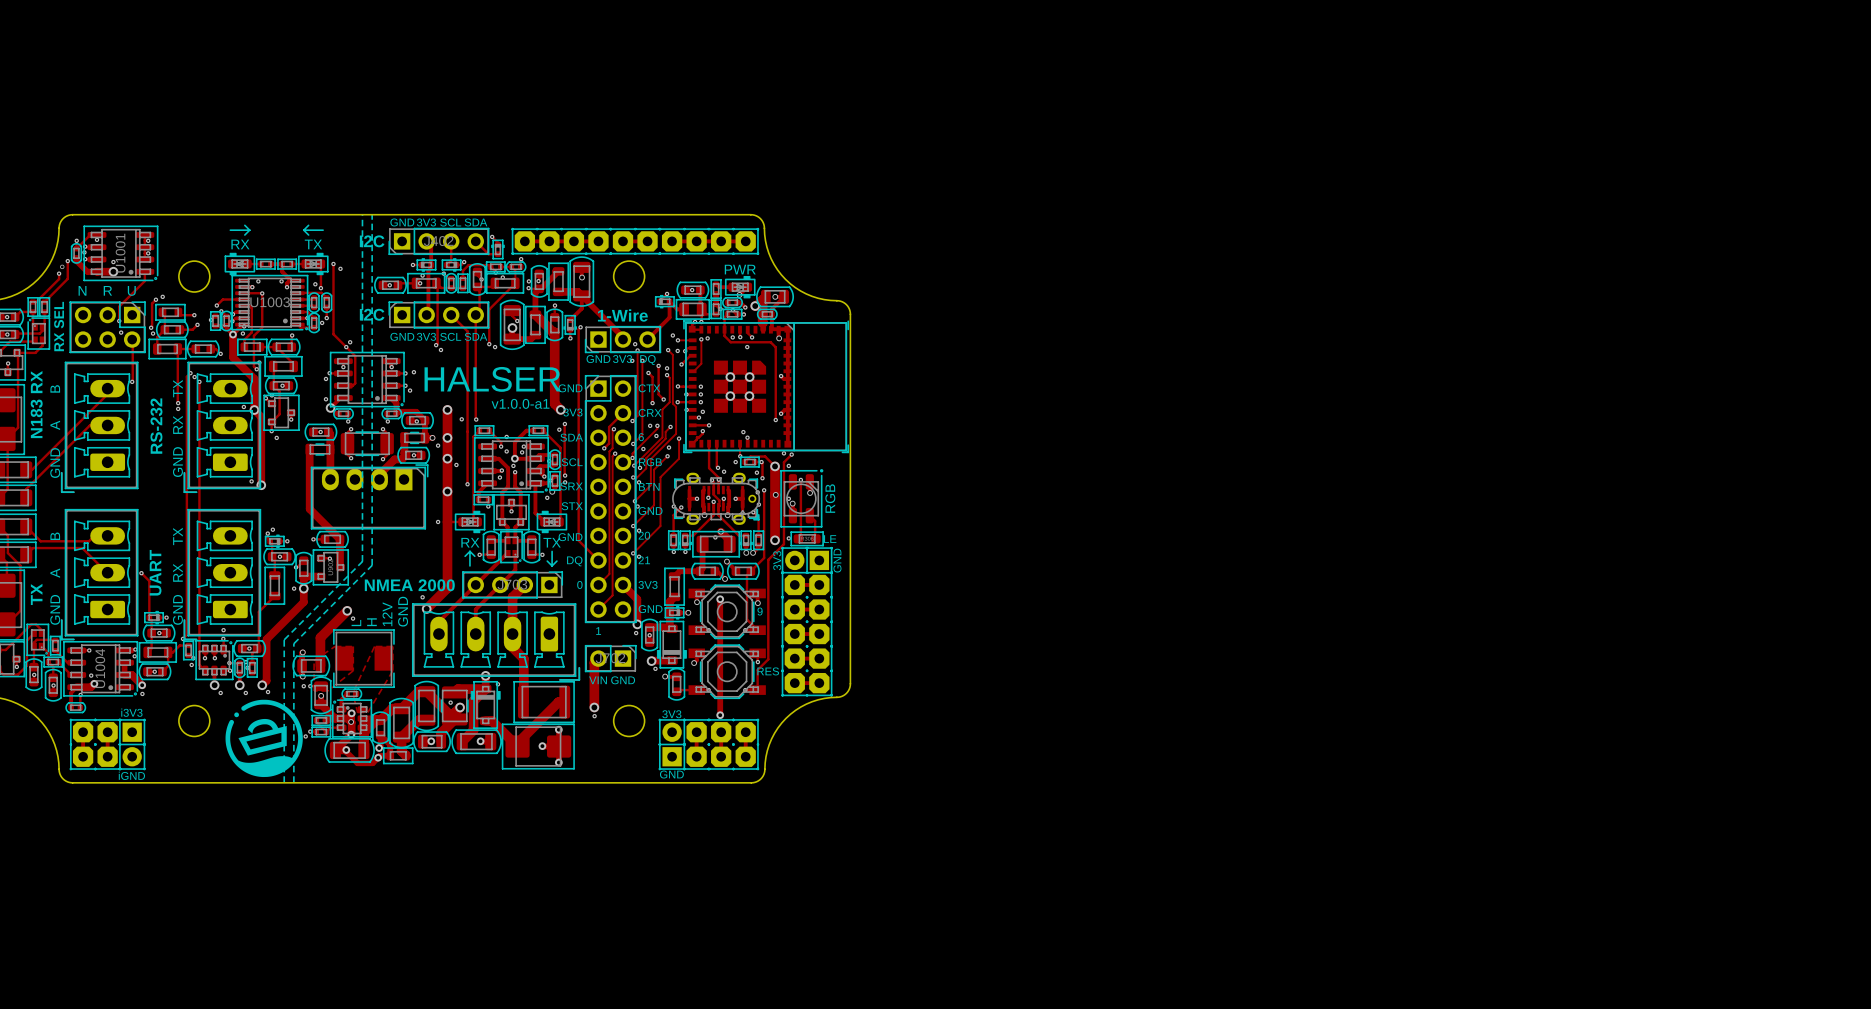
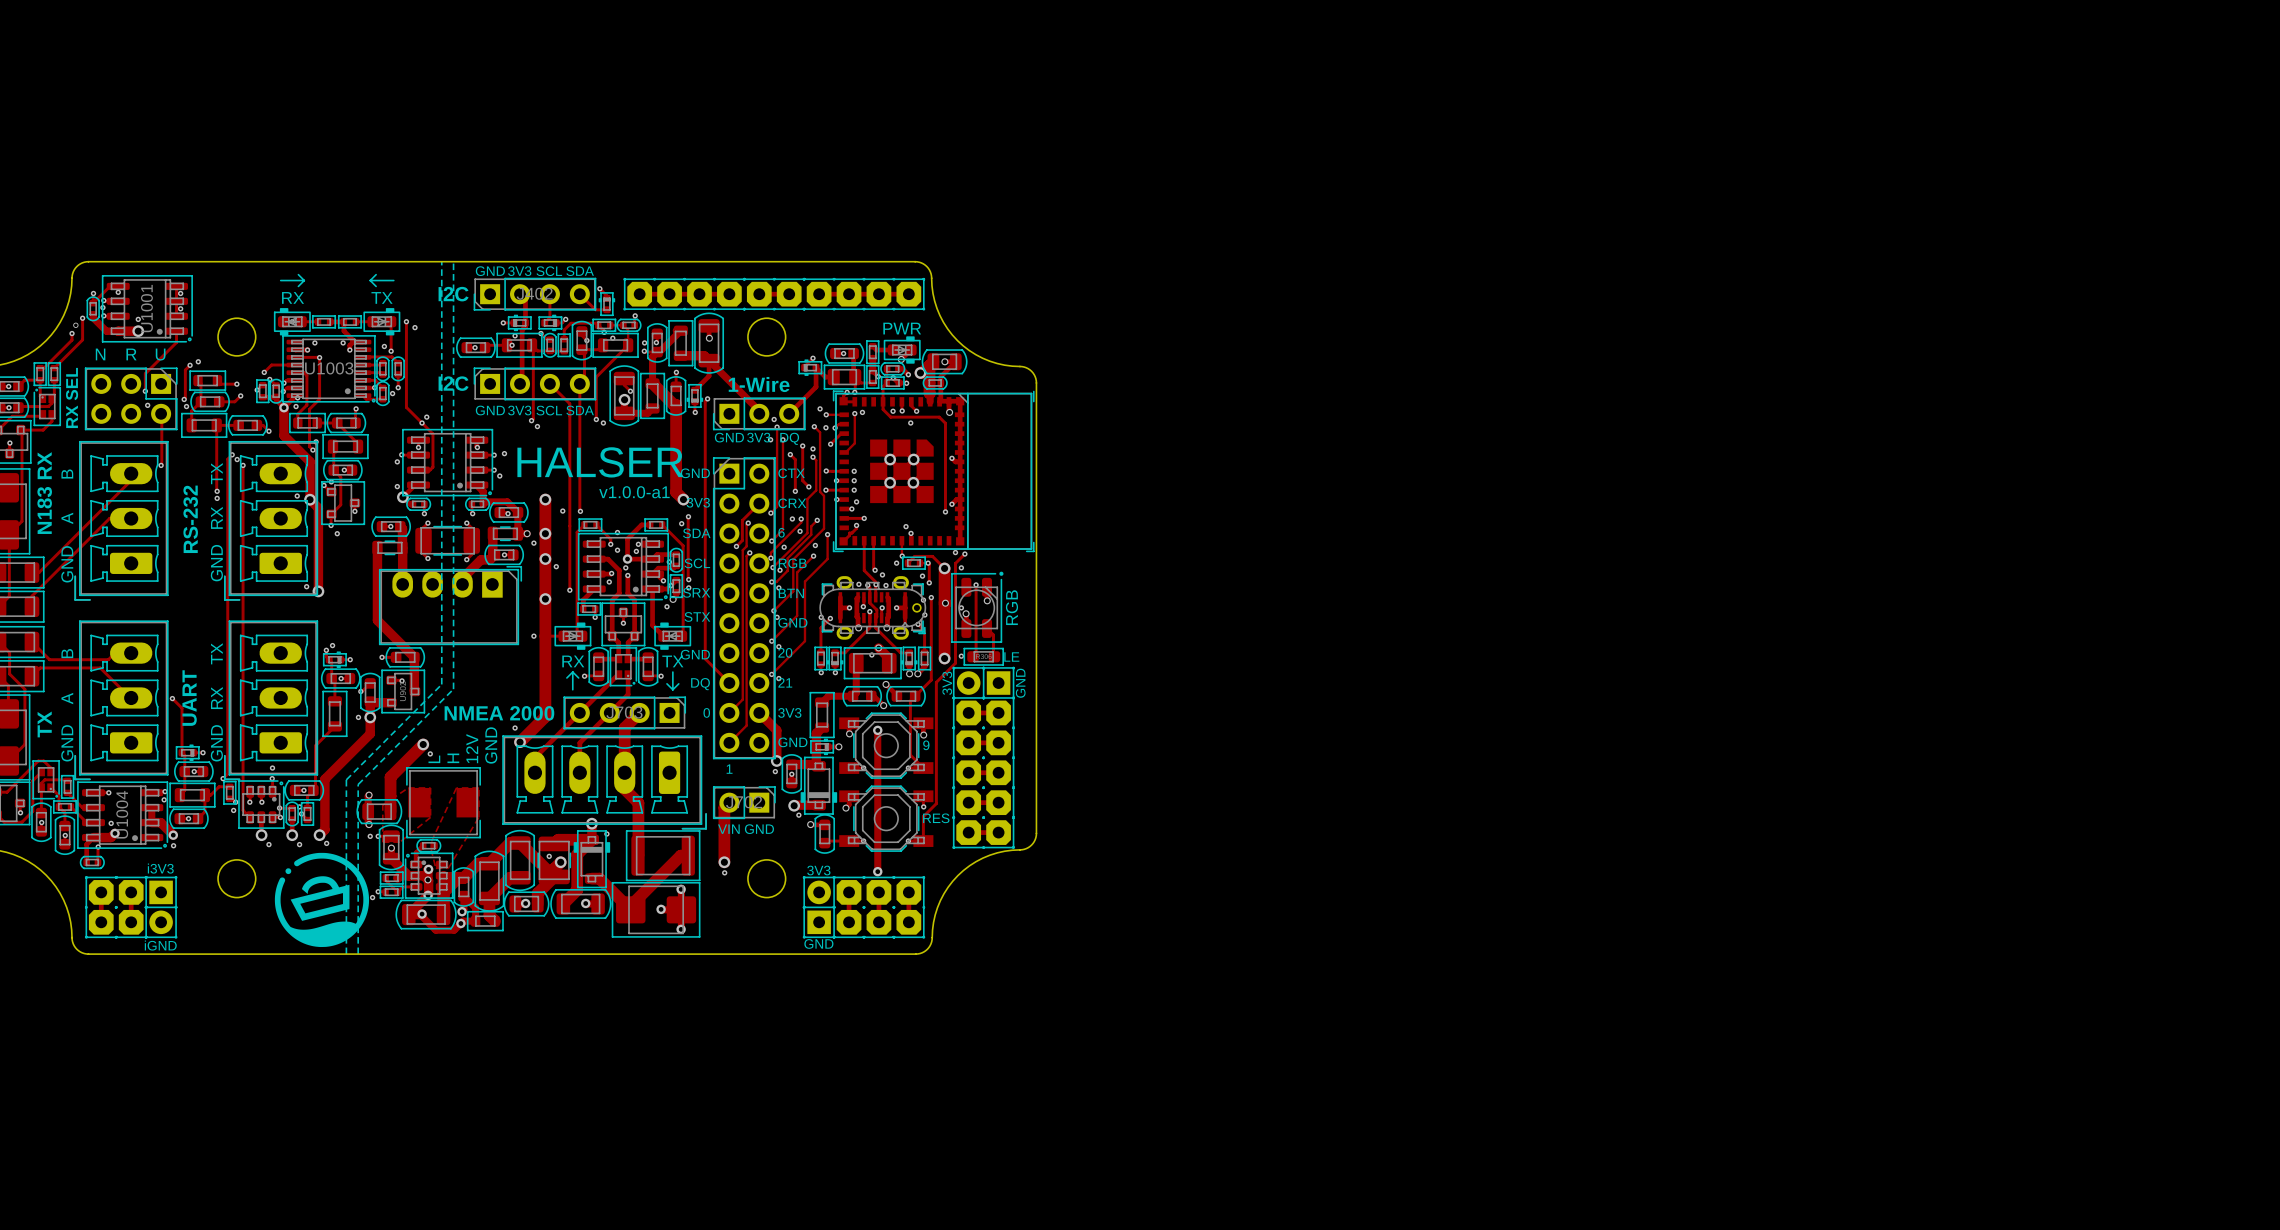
via: none -> (858, 584)
via: none -> (886, 585)

